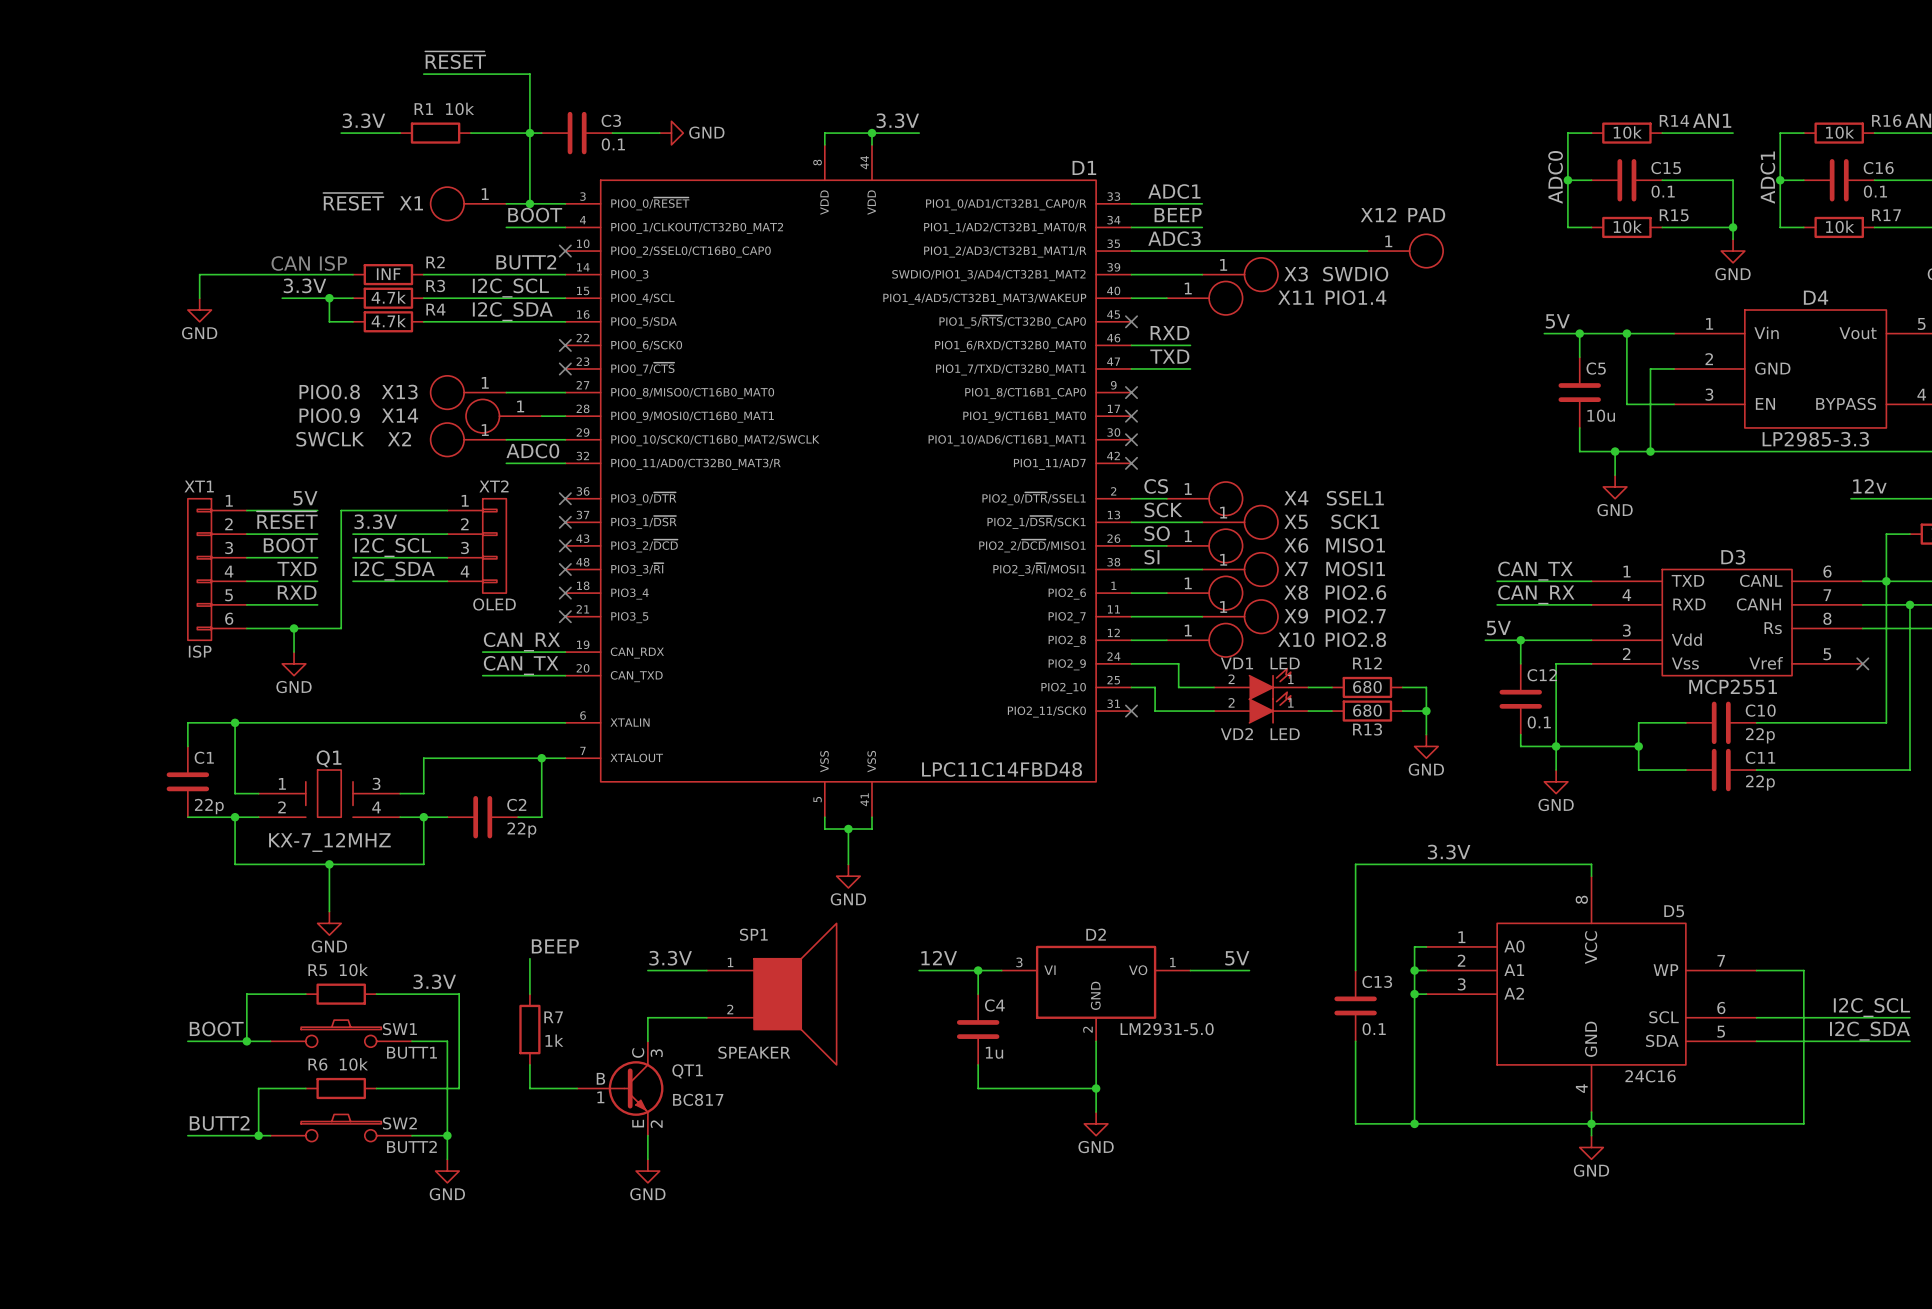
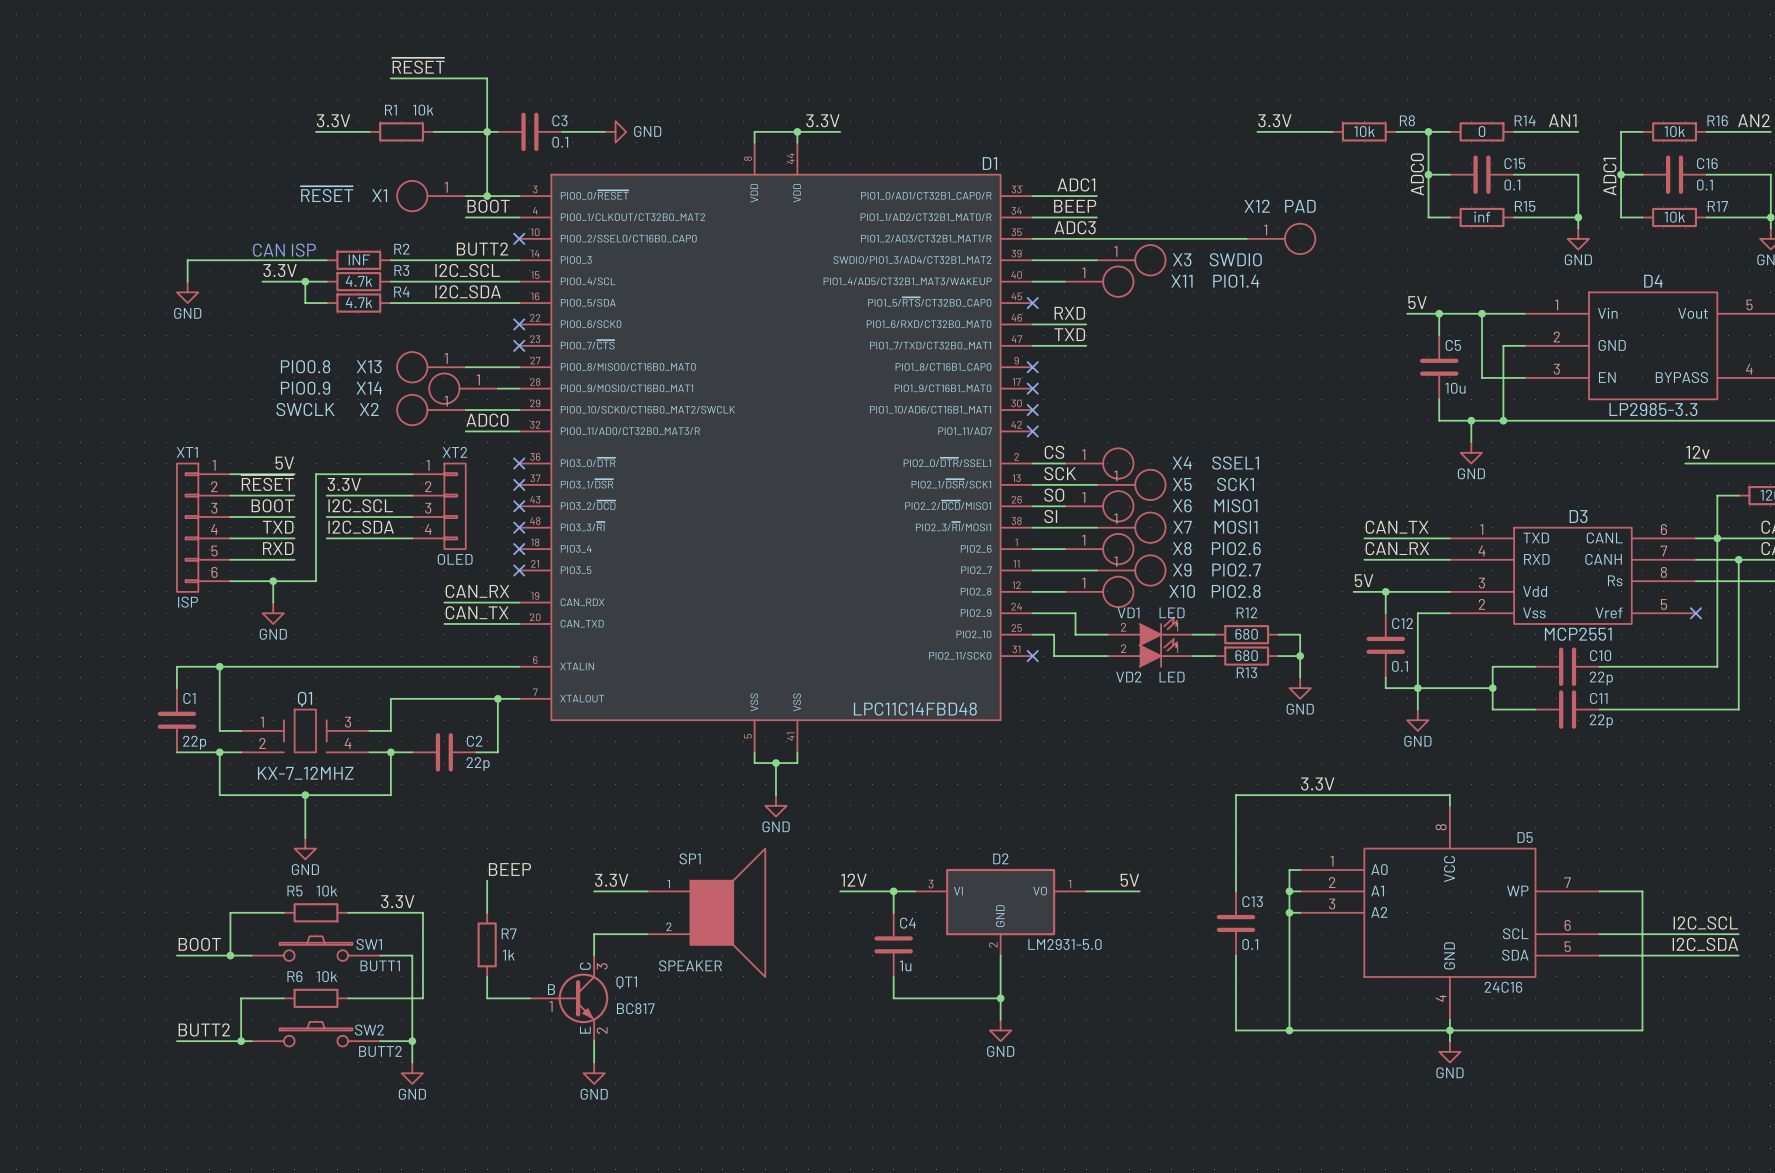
label: none -> 3.3V (1274, 120)
R14 value: 10k (1627, 132) -> 0 (1482, 131)
wire: none -> (1257, 131) (1332, 131)
R8: none -> 10k (1364, 131)
wire: none -> (1396, 131) (1428, 131)
junction: none -> (1428, 131)
R15 value: 10k (1627, 226) -> inf (1482, 217)

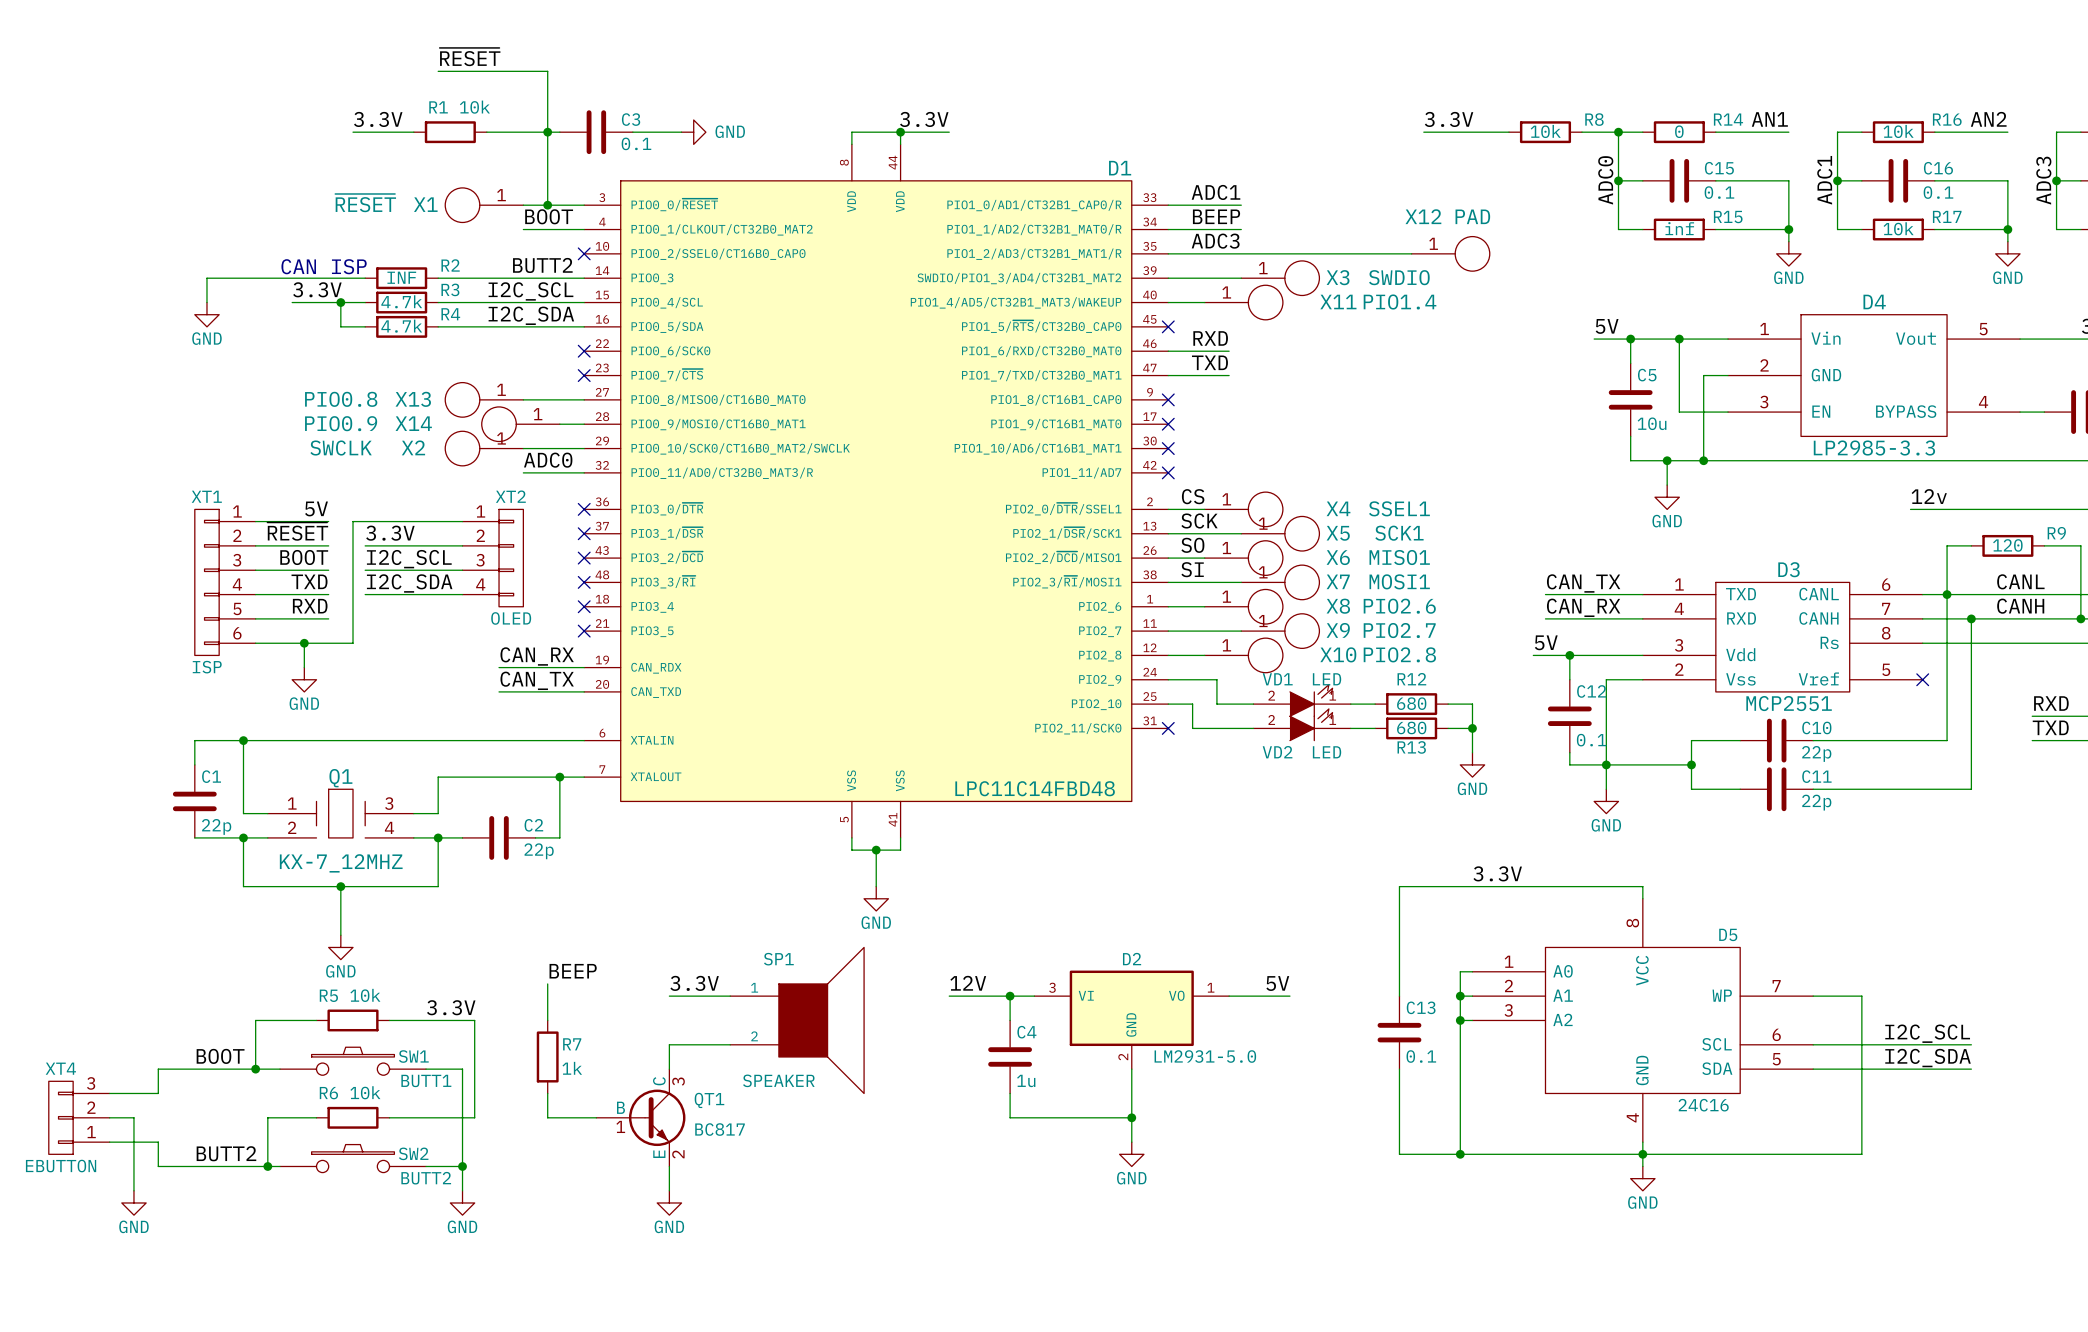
wire: none -> (194, 1069) (158, 1069) (158, 1093) (109, 1093)
XT4: none -> EBUTTON (79, 1117)
wire: none -> (109, 1117) (133, 1117) (133, 1190)
wire: none -> (109, 1142) (158, 1142) (158, 1166) (194, 1166)
power symbol: none -> GND (133, 1202)

